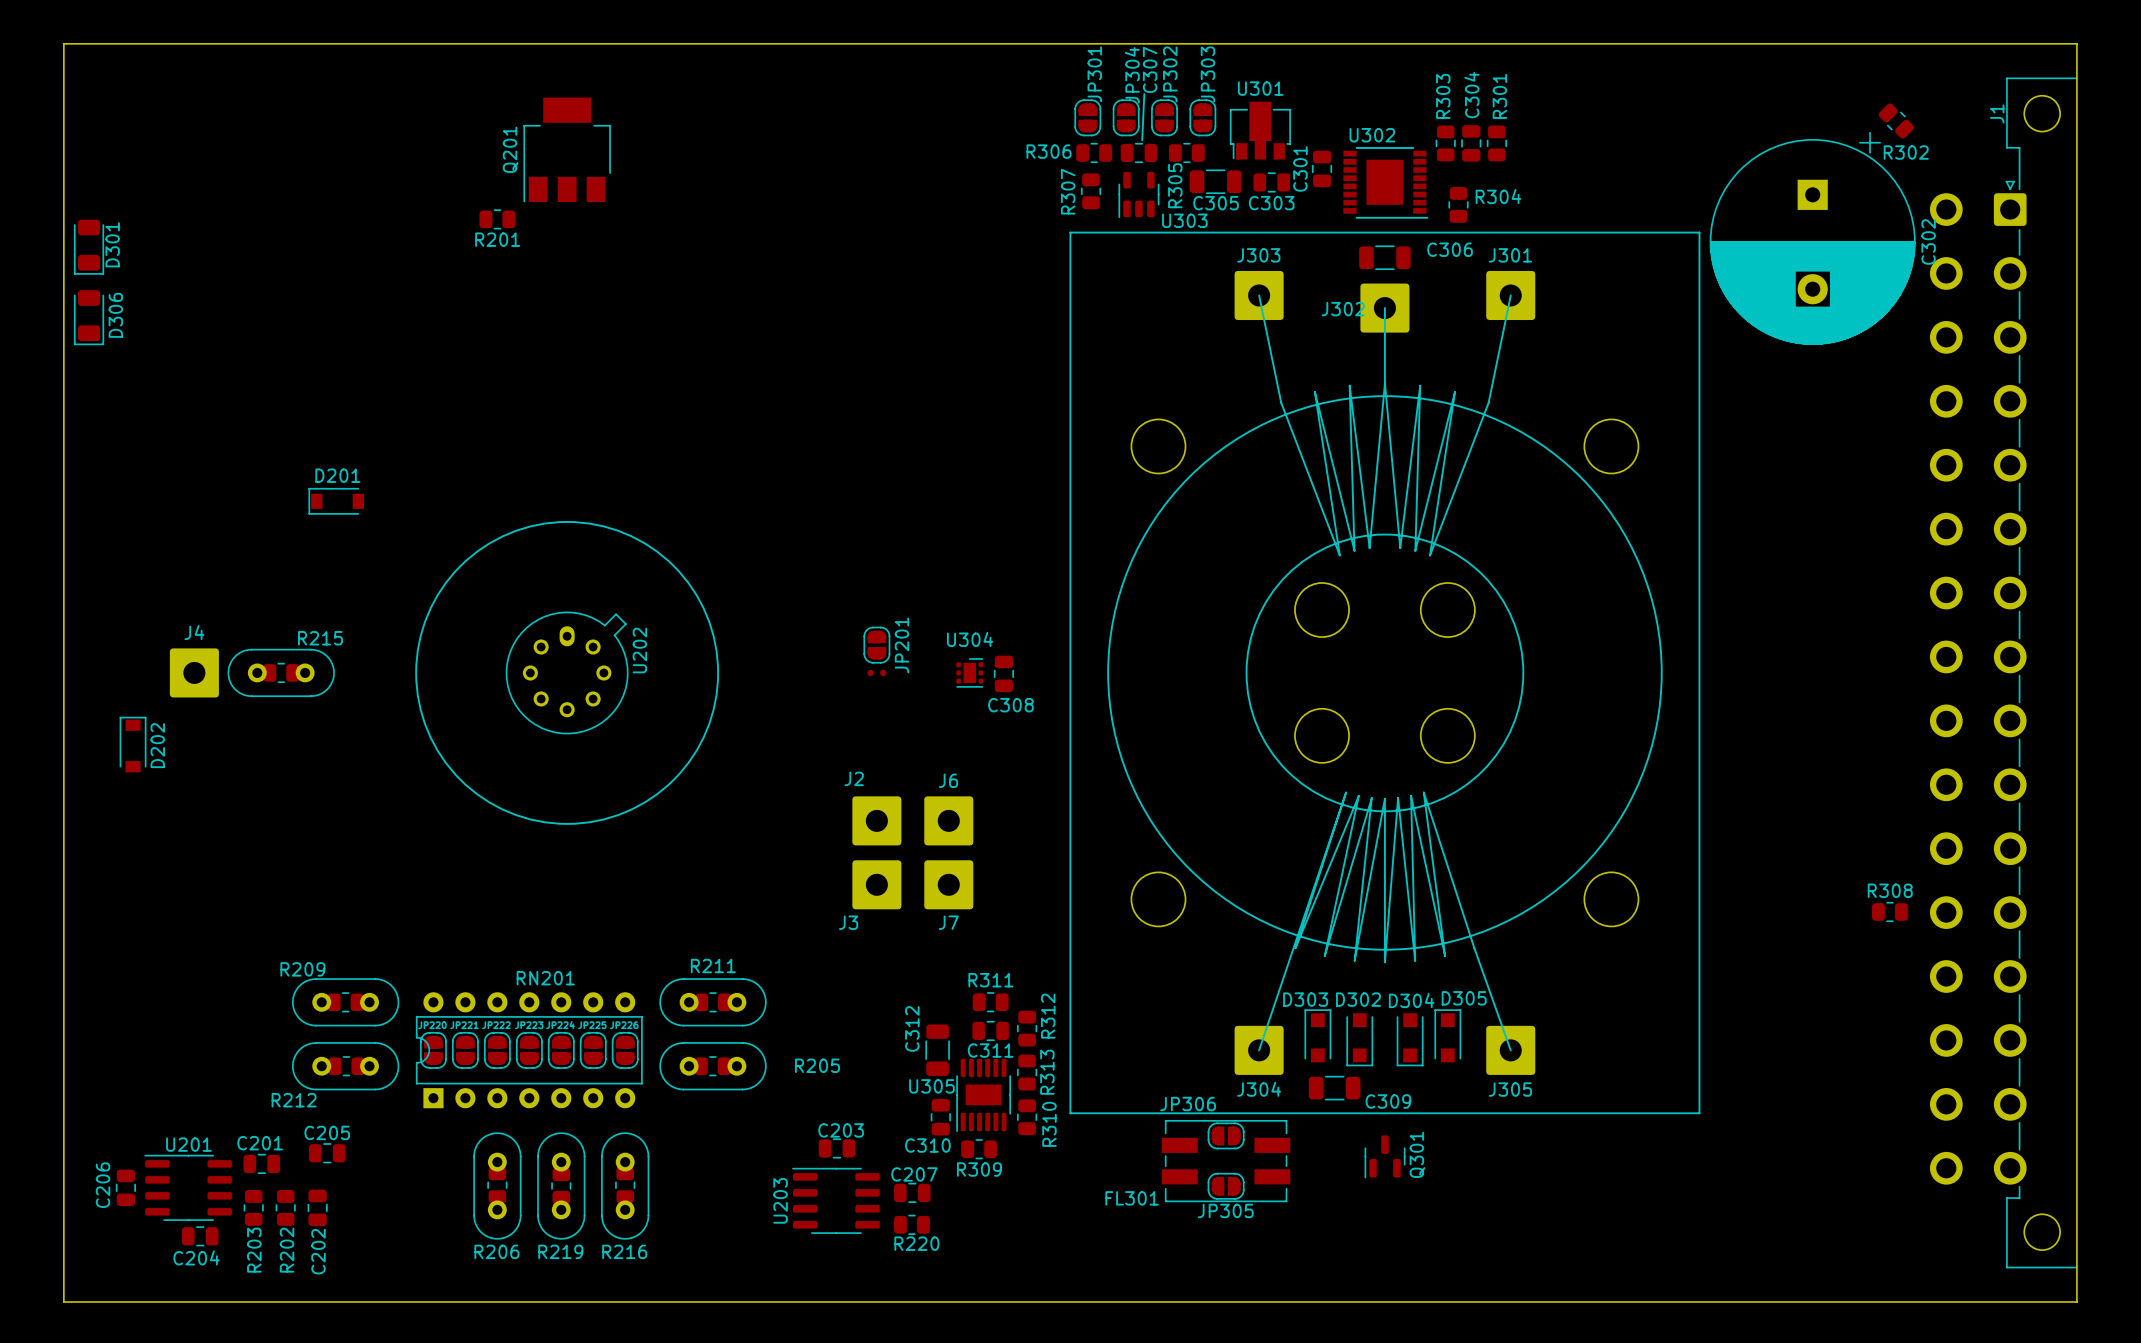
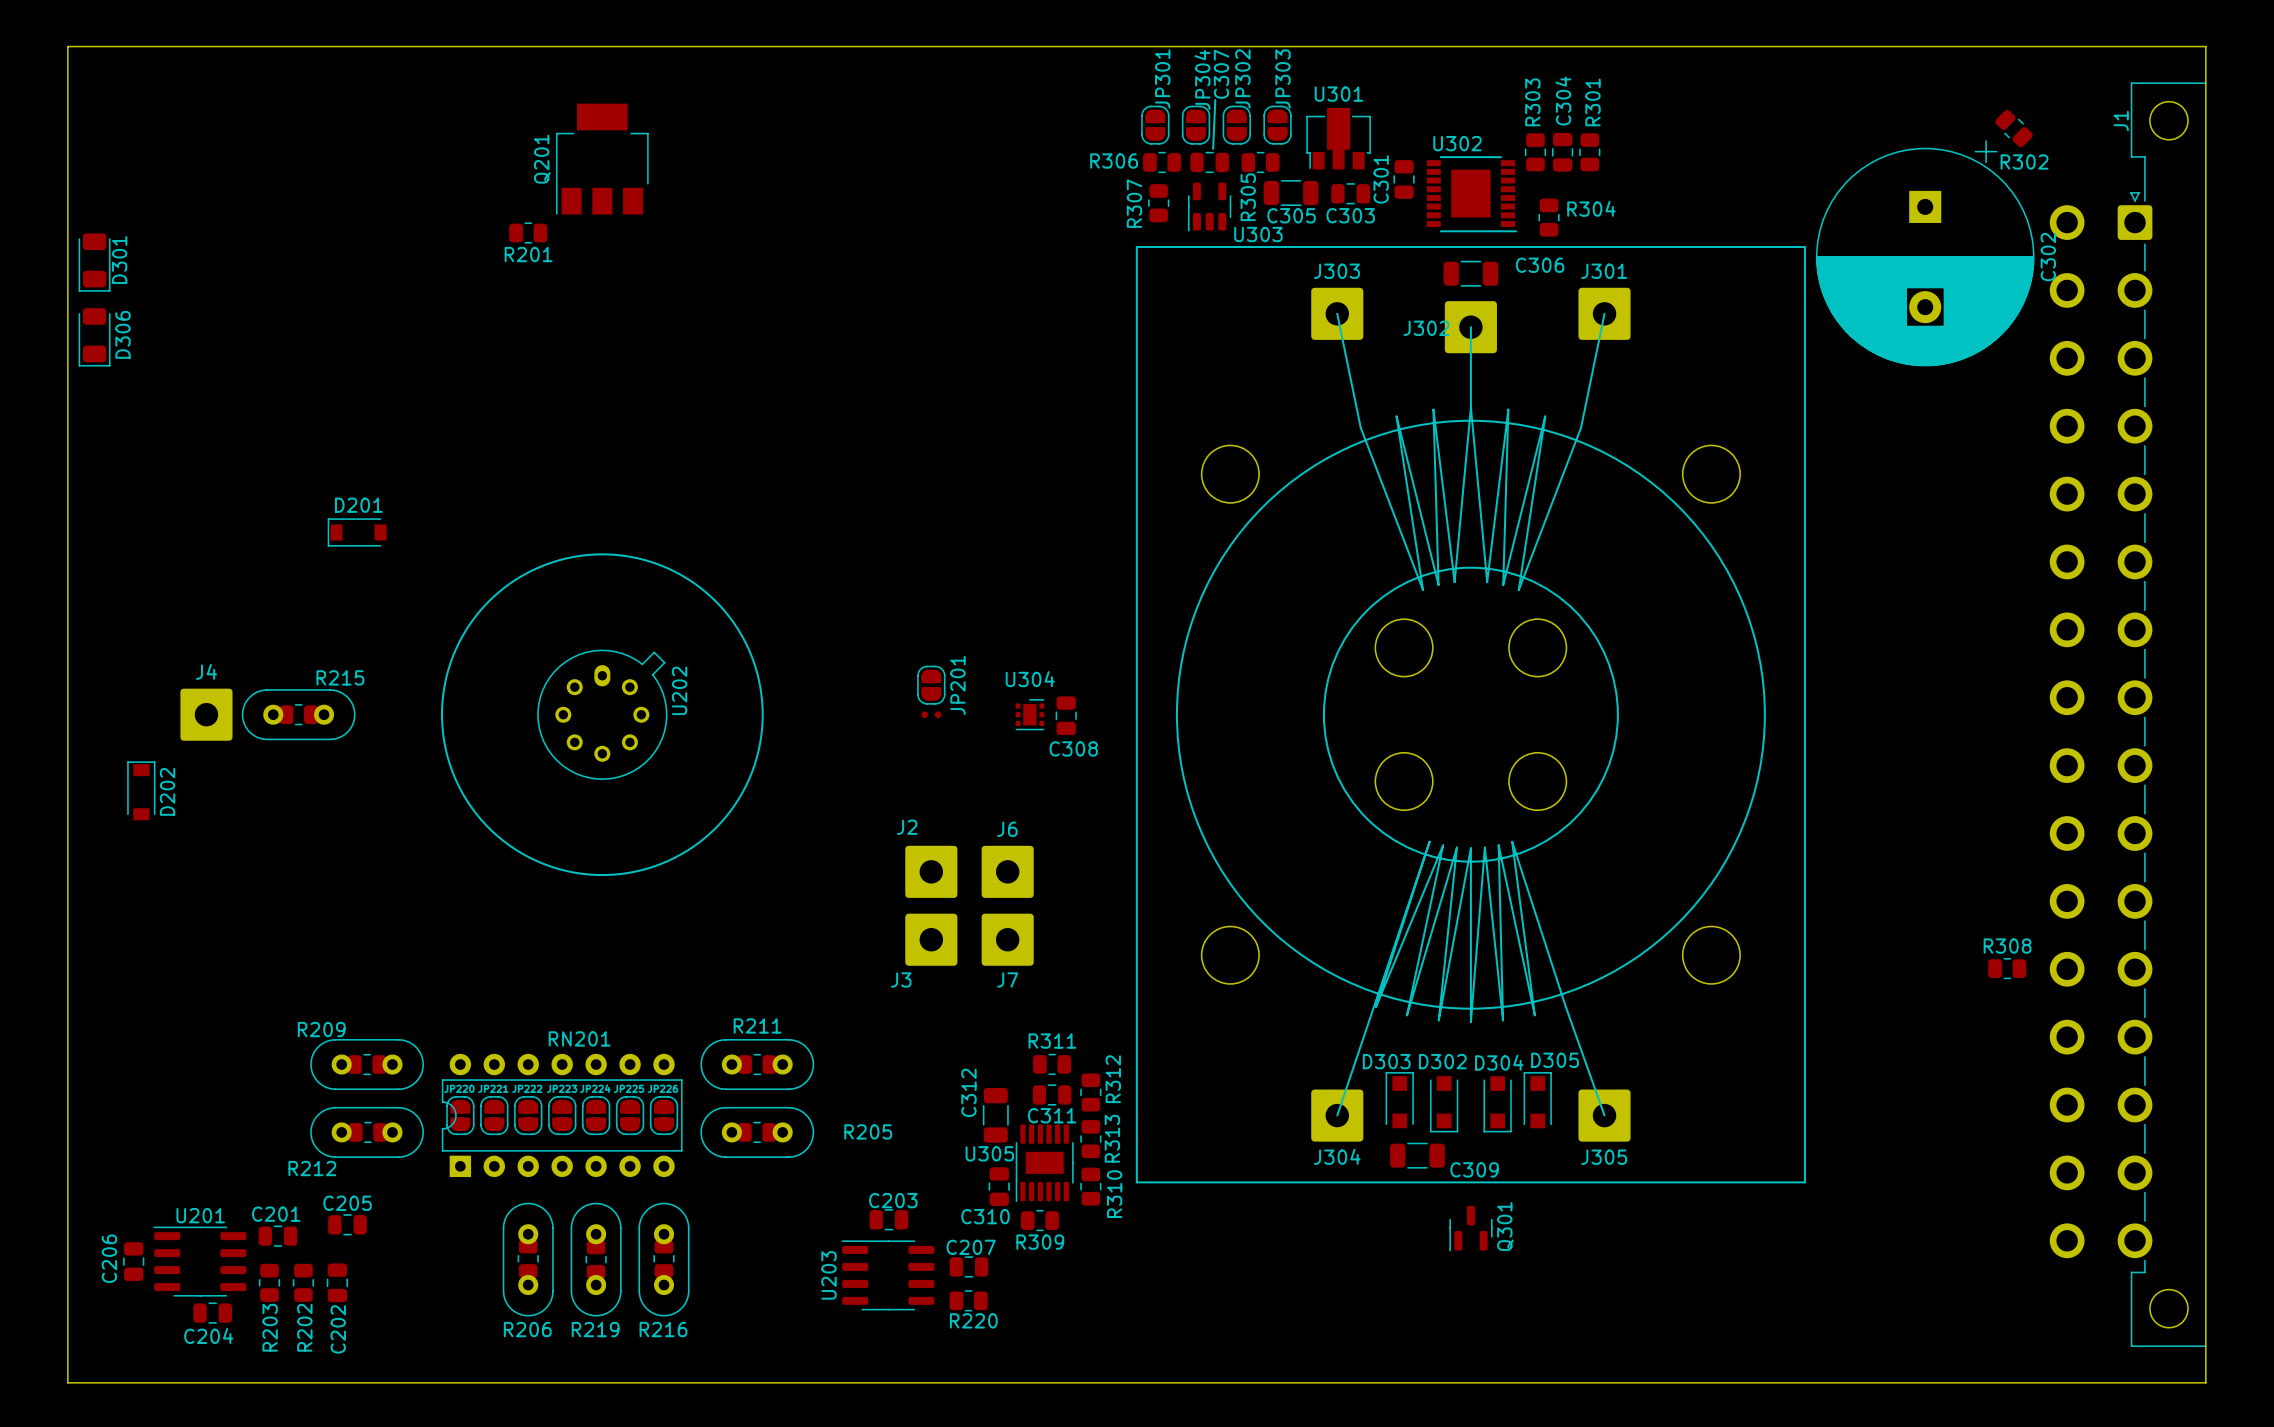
JP306: (1226, 1135) -> none
FL301: (1226, 1161) -> none
JP305: (1226, 1186) -> none

